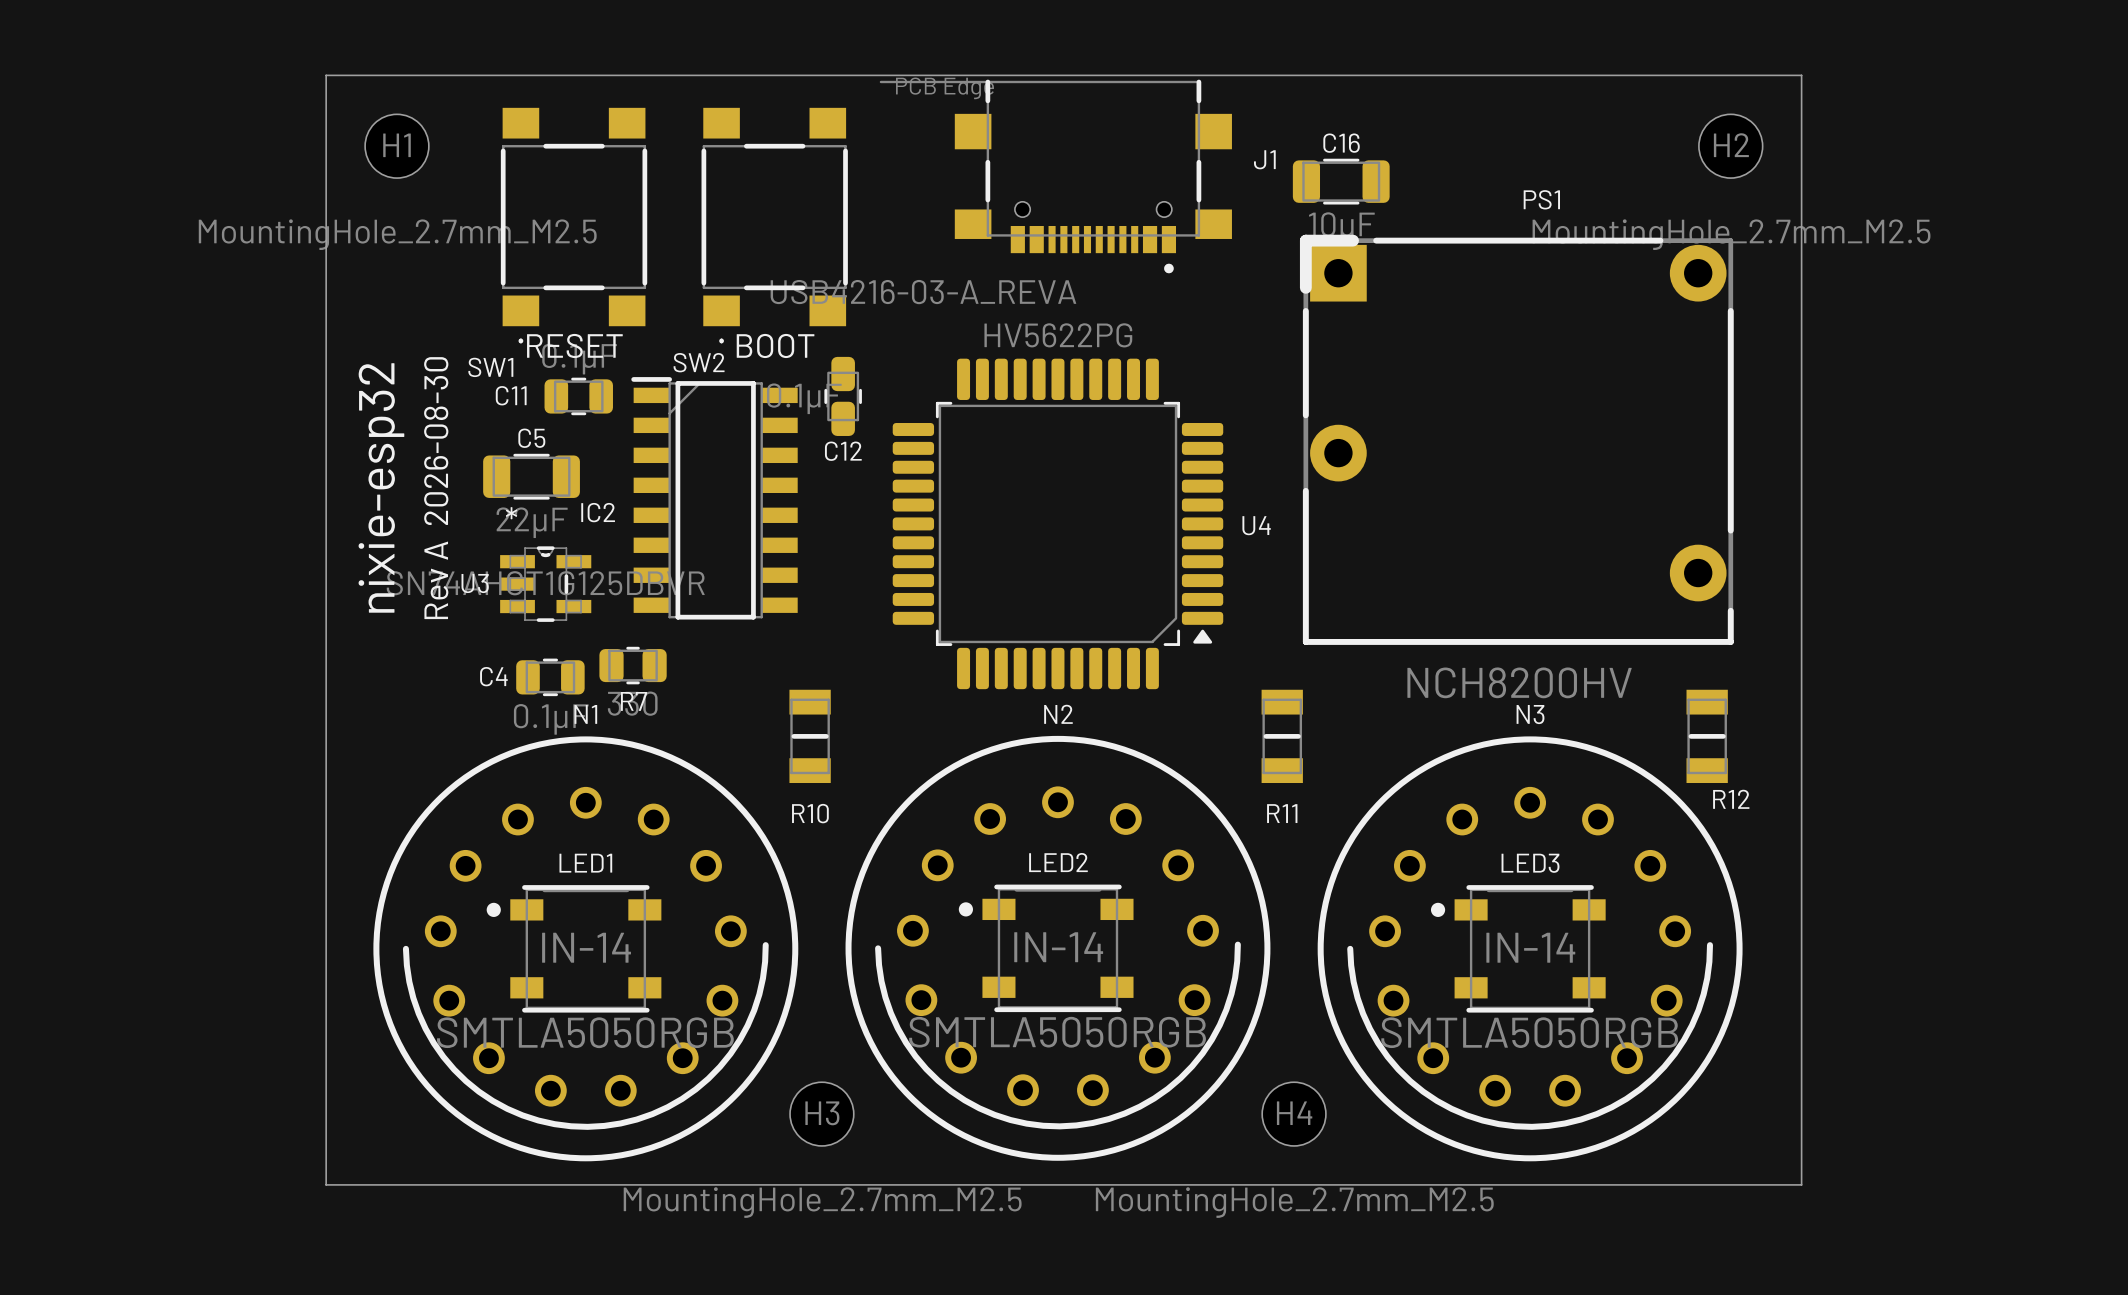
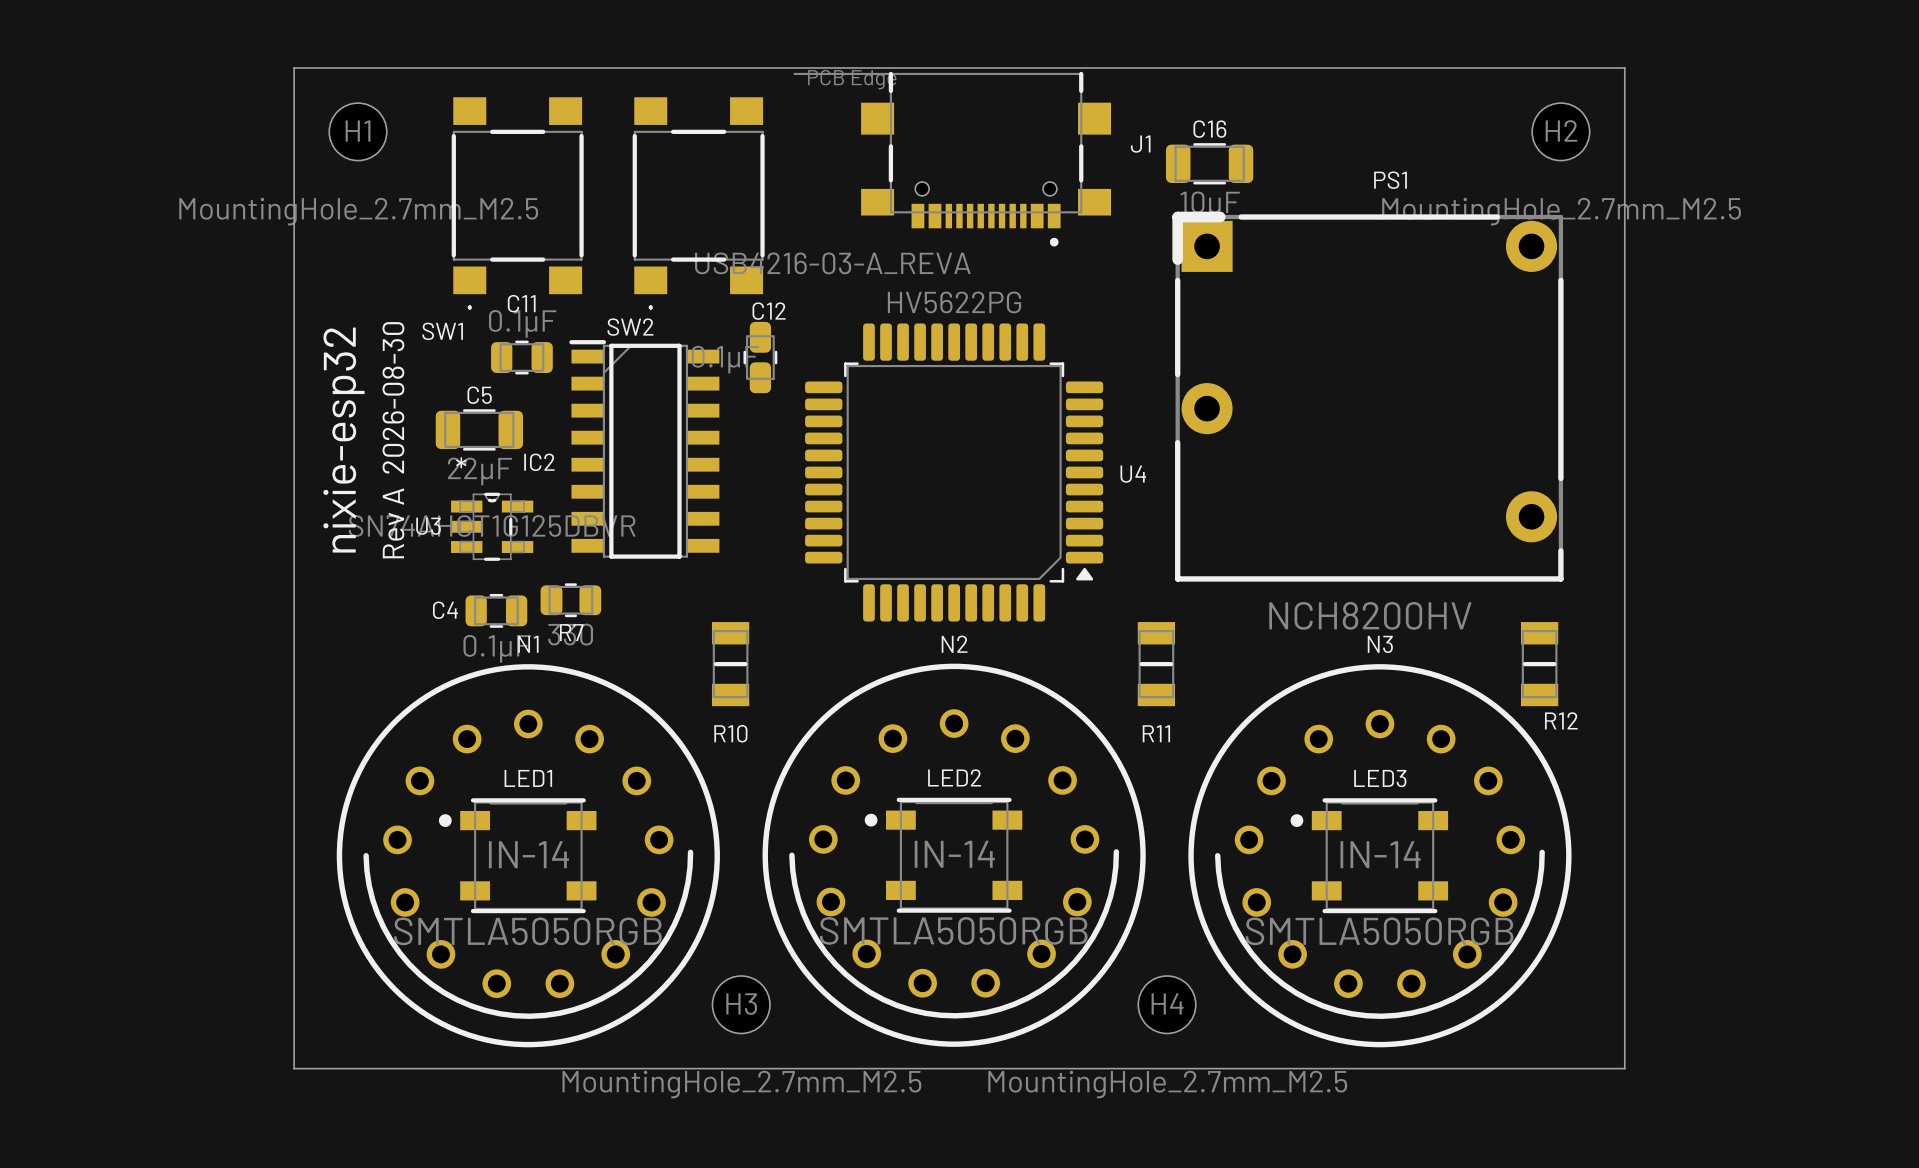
SW1 value: RESET (574, 345) -> none
SW2 value: BOOT (775, 345) -> none
C11 name position: C11 (511, 395) -> C11 (521, 303)
C12 name position: C12 (843, 451) -> C12 (769, 311)

